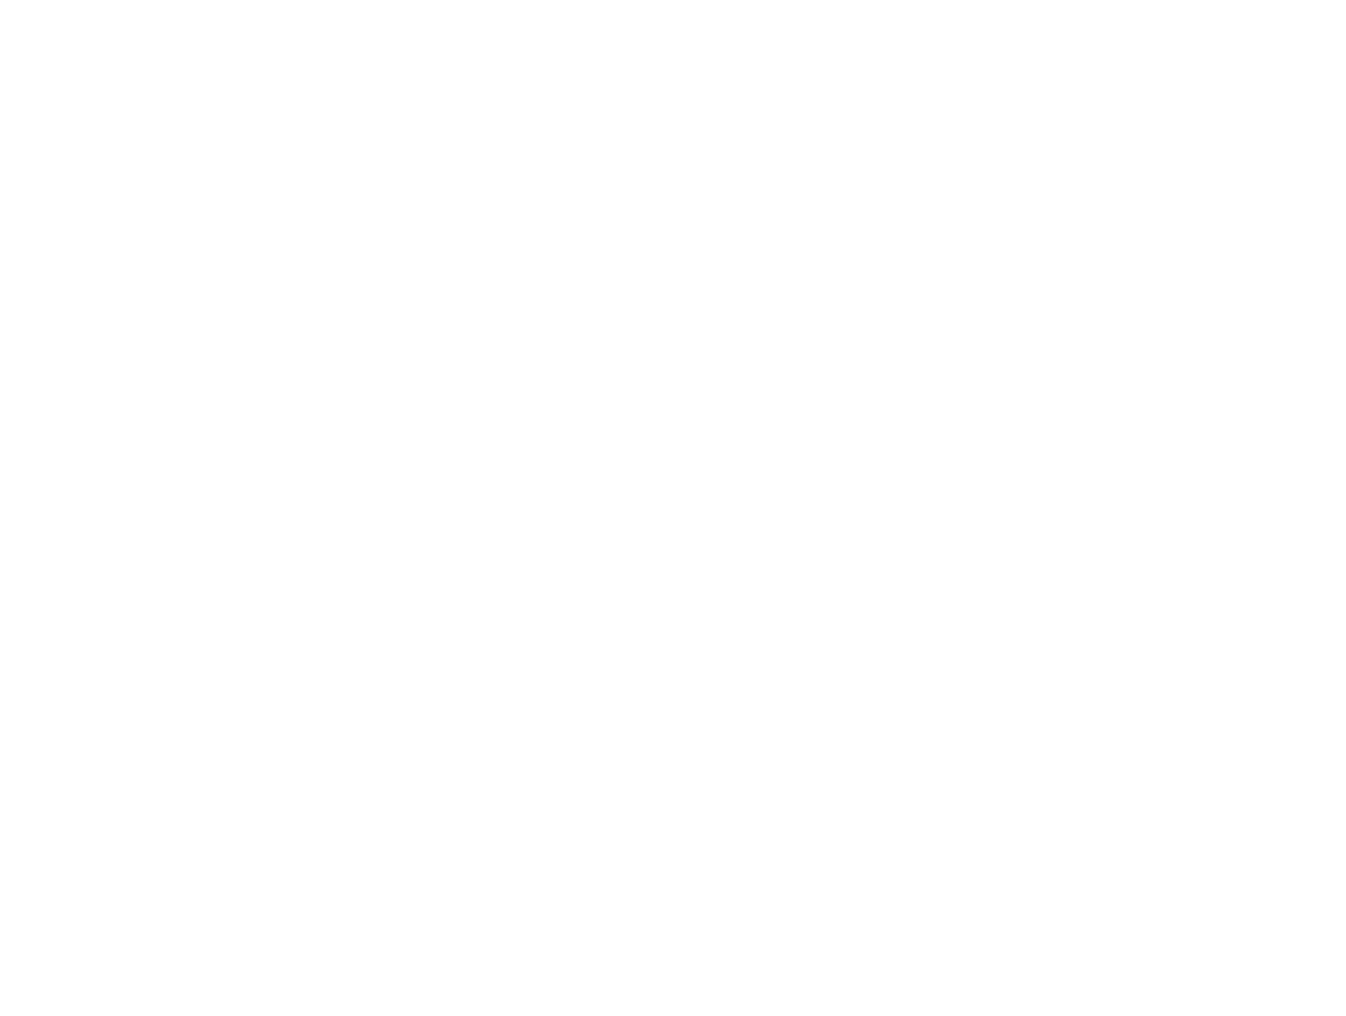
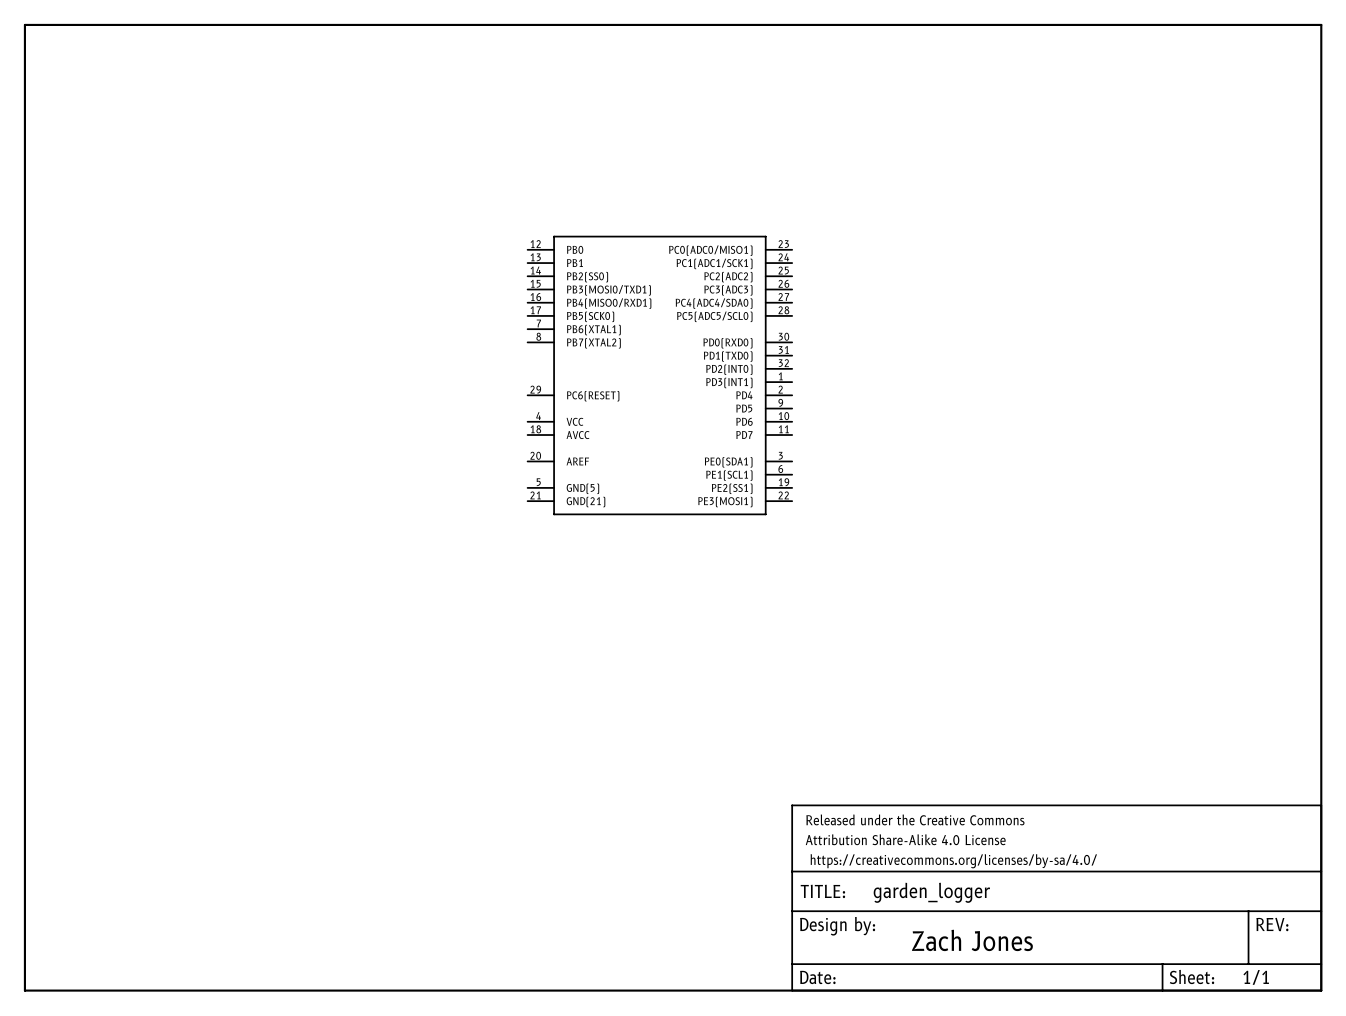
part: none -> (659, 375)
part: none -> (673, 507)
part: none -> (1056, 897)
text: none -> Zach Jones (972, 940)

